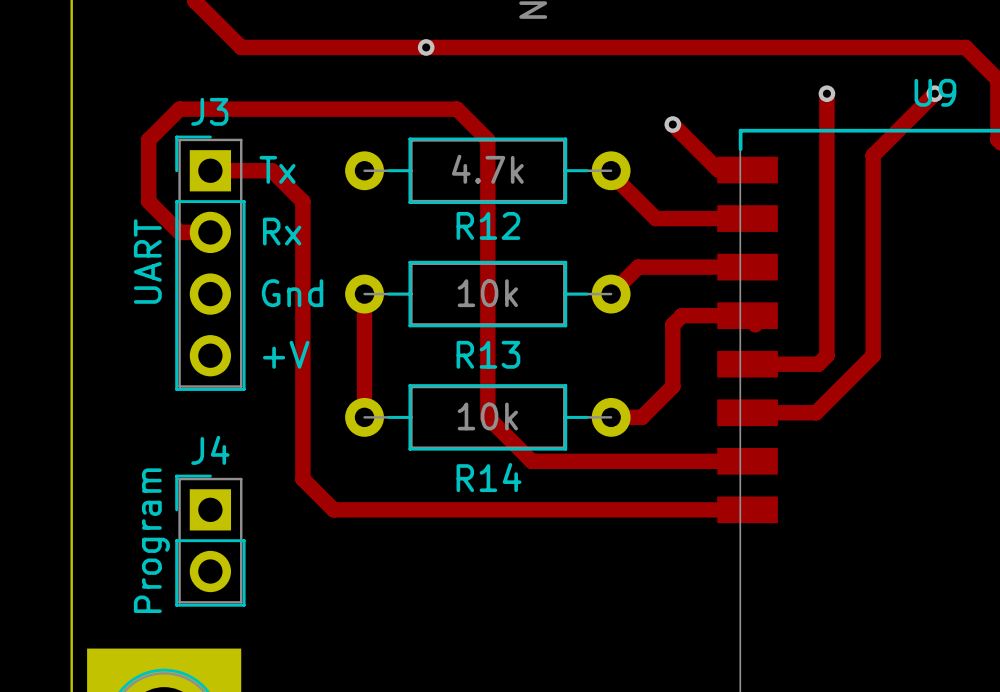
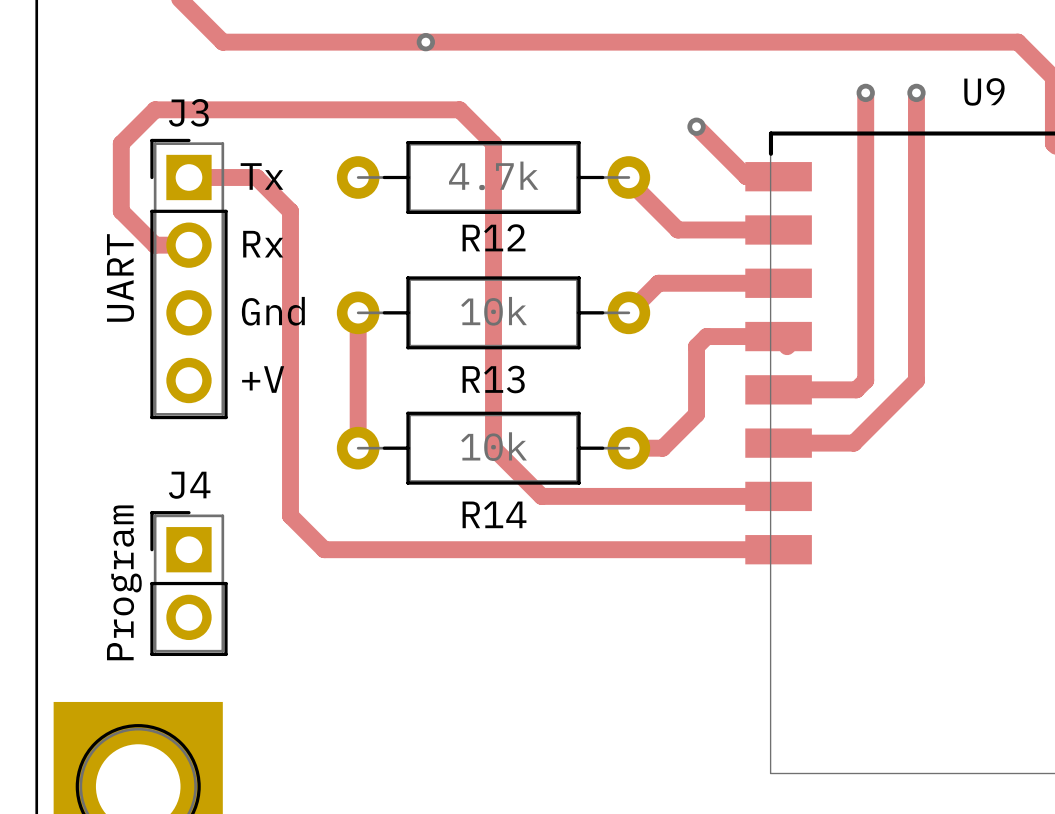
track: (934, 93) (873, 155) -> (916, 92) (916, 160)
via position: (934, 93) -> (916, 92)

